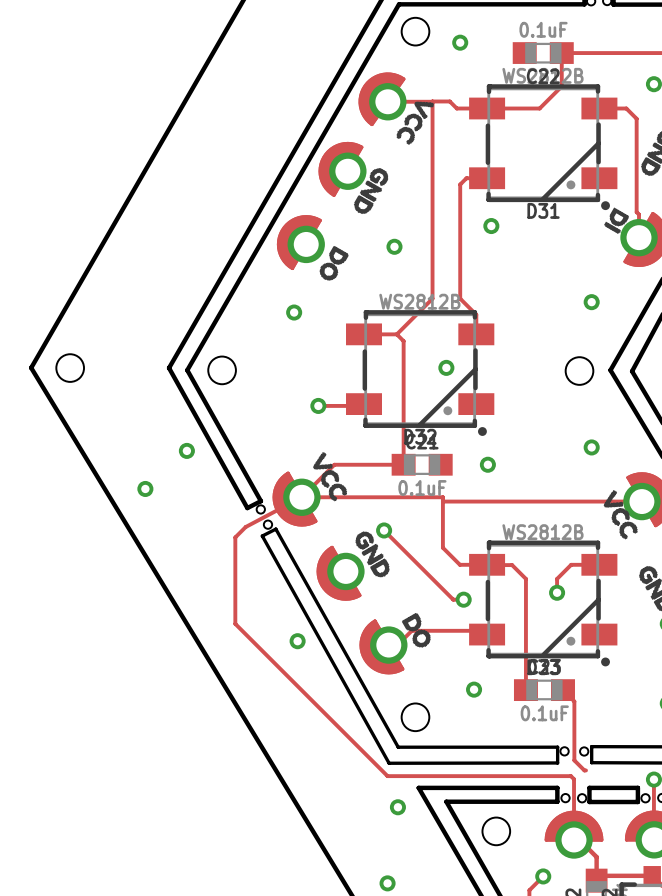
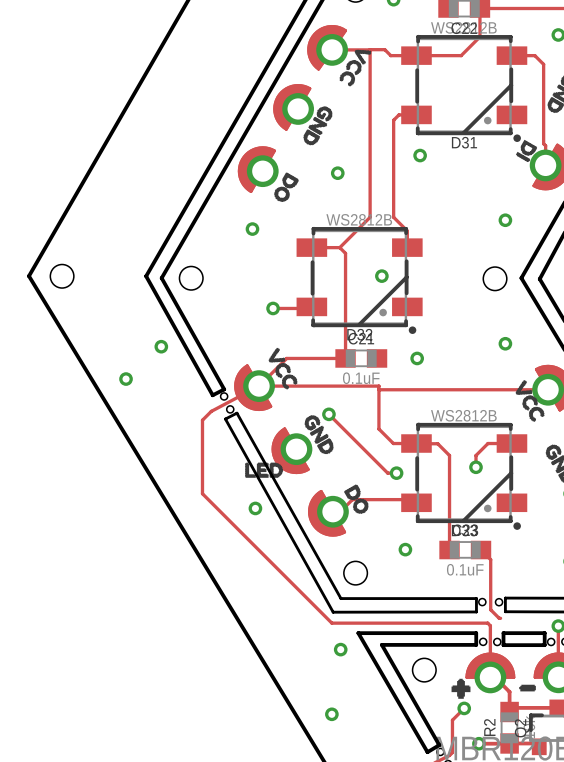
drawing: none -> [245, 462, 284, 478]
drawing: none -> [451, 678, 471, 699]
drawing: none -> [519, 684, 536, 692]

